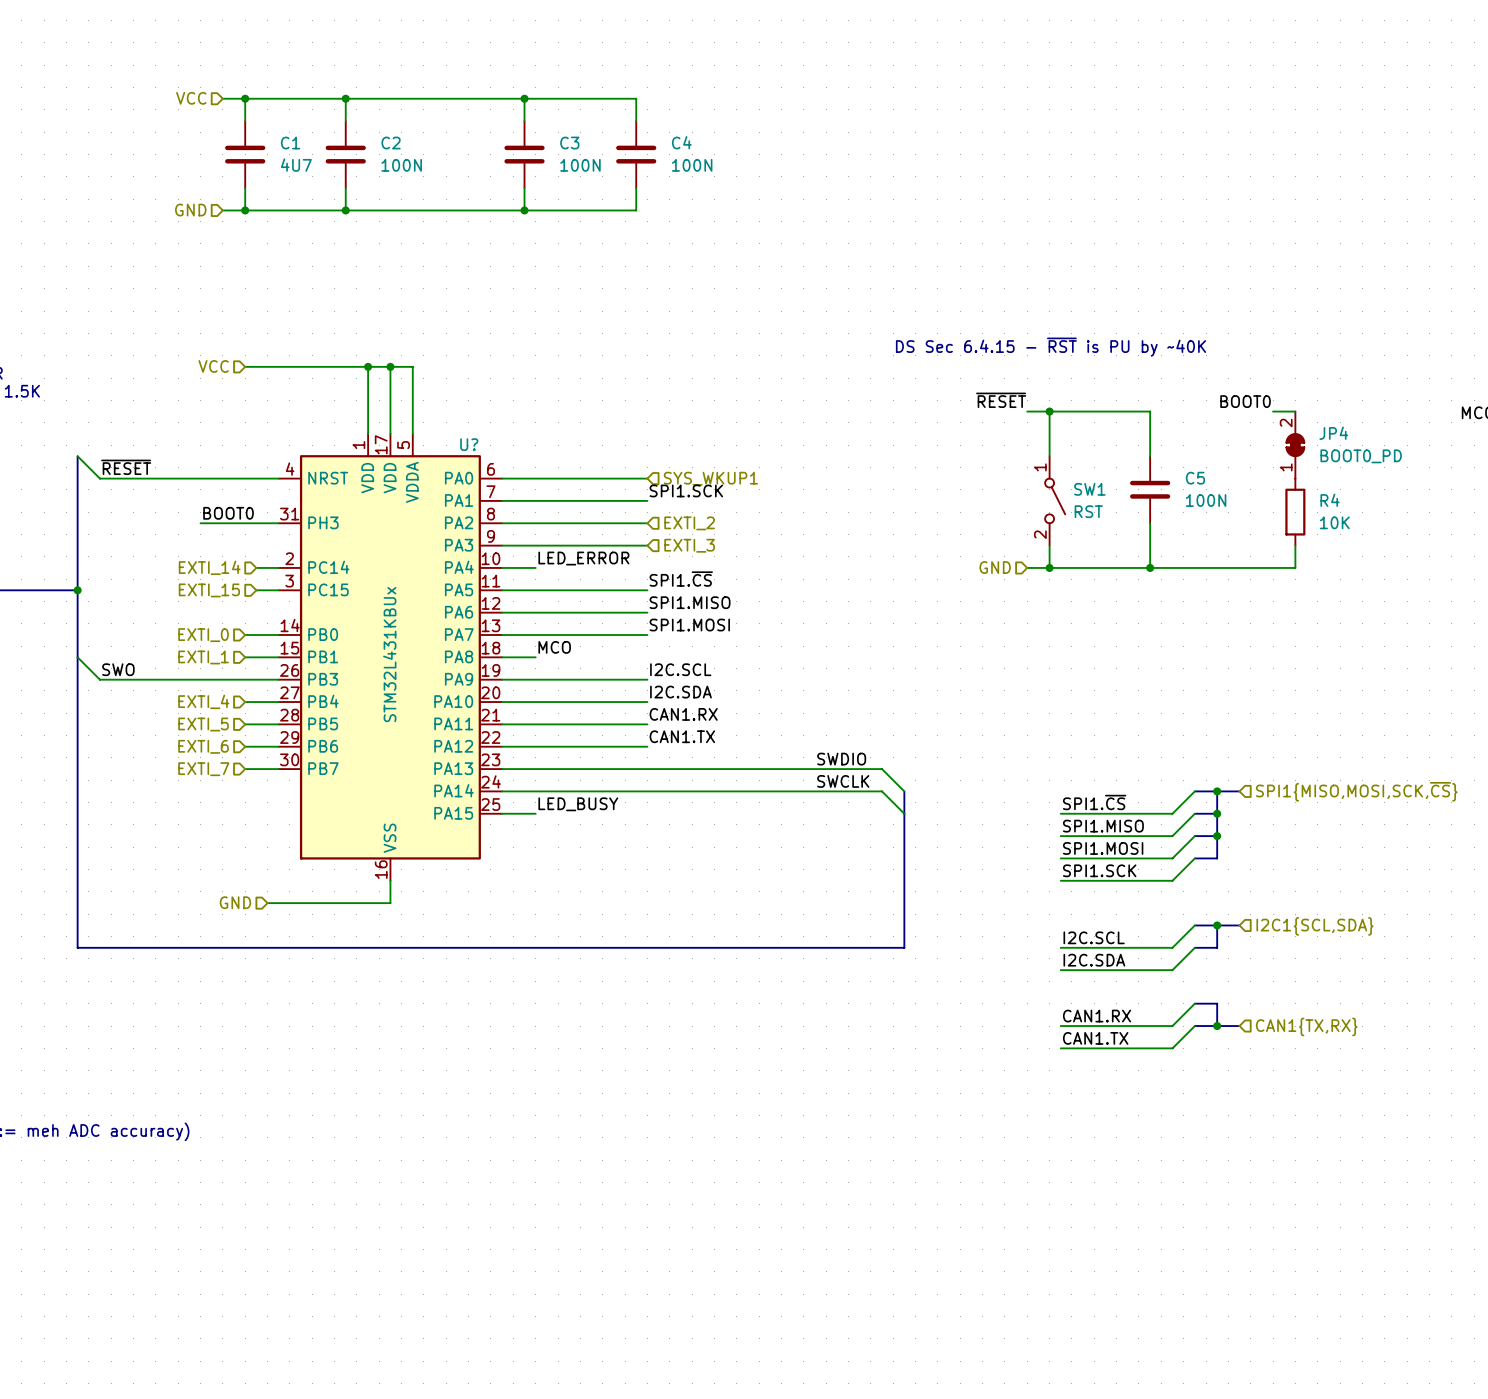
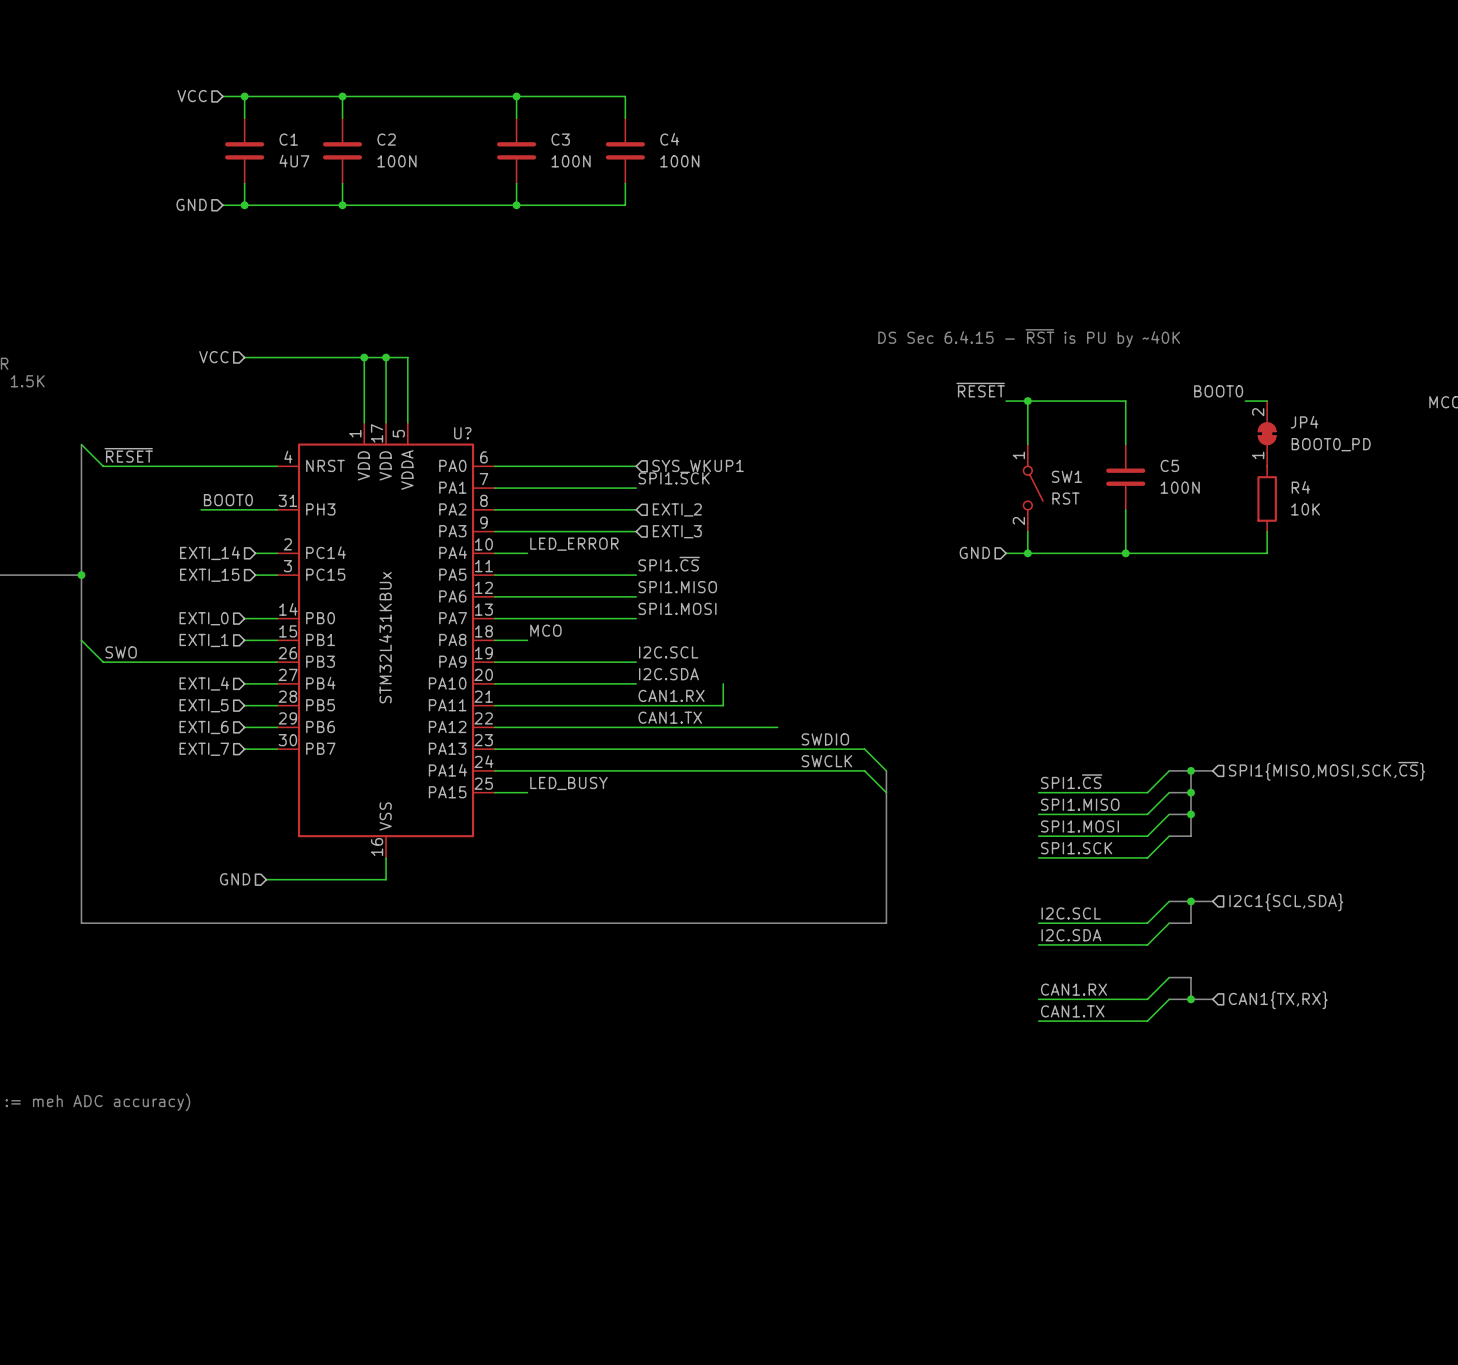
wire: none -> (723, 683) (723, 705) (636, 705)
wire: none -> (636, 727) (777, 727)

